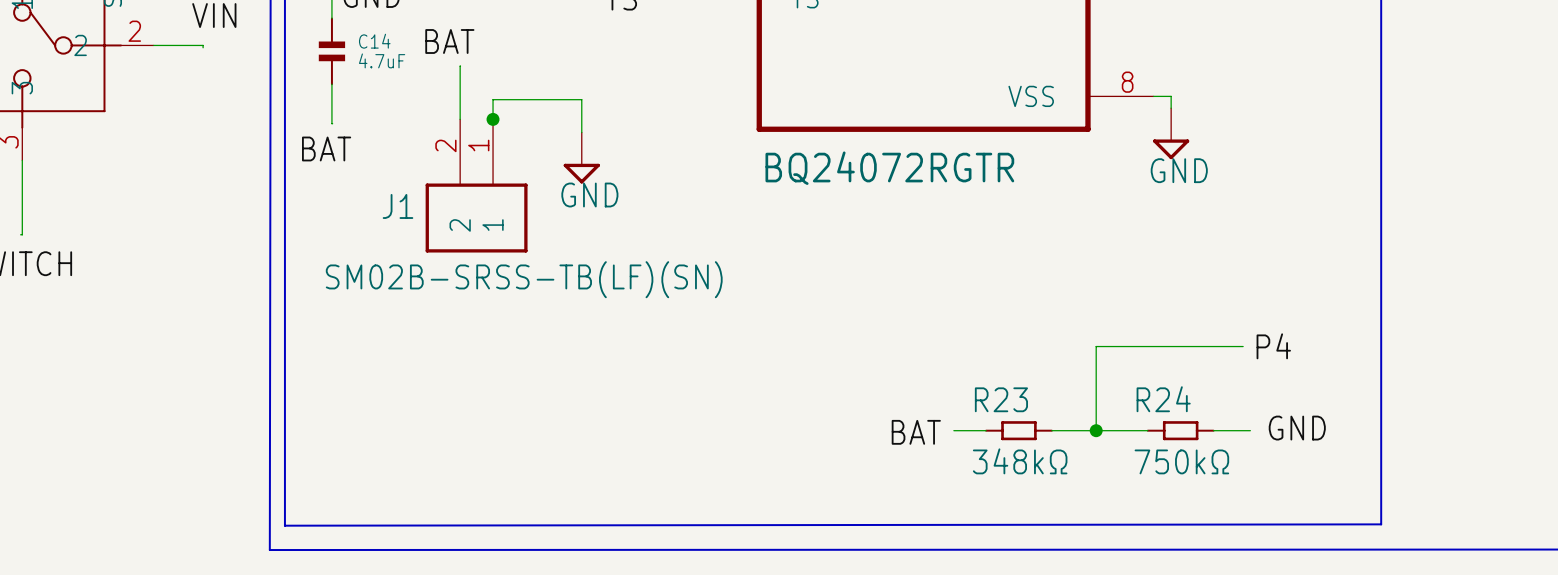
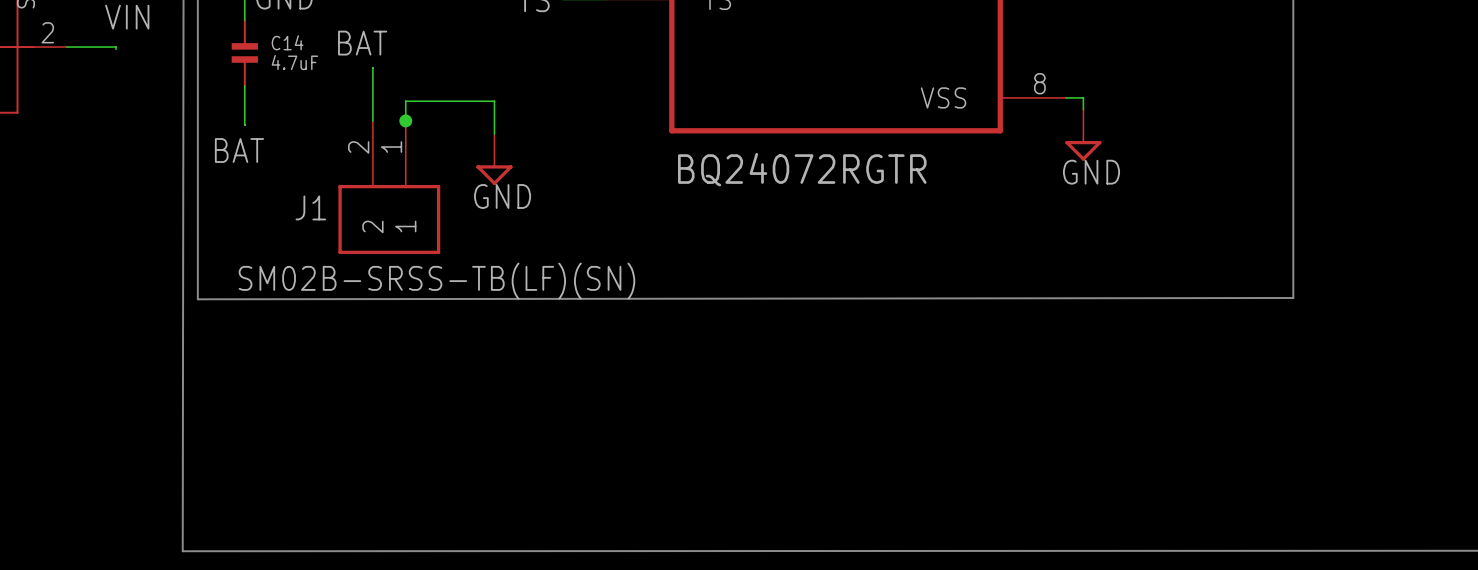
line: (1381, 296) (1381, 524) (284, 525) (284, 297) -> (1293, 297) (197, 299)
wire: (1243, 346) (1096, 346) (1096, 430) -> none
label: P4 (1273, 346) -> none
label: GND (1297, 428) -> none
wire: (953, 430) (986, 430) -> none
R23: 348kΩ (1018, 430) -> none
wire: (1051, 430) (1147, 430) -> none
junction: (1096, 430) -> none
R24: 750kΩ (1180, 430) -> none
wire: (1213, 430) (1250, 430) -> none
label: BAT (916, 432) -> none

